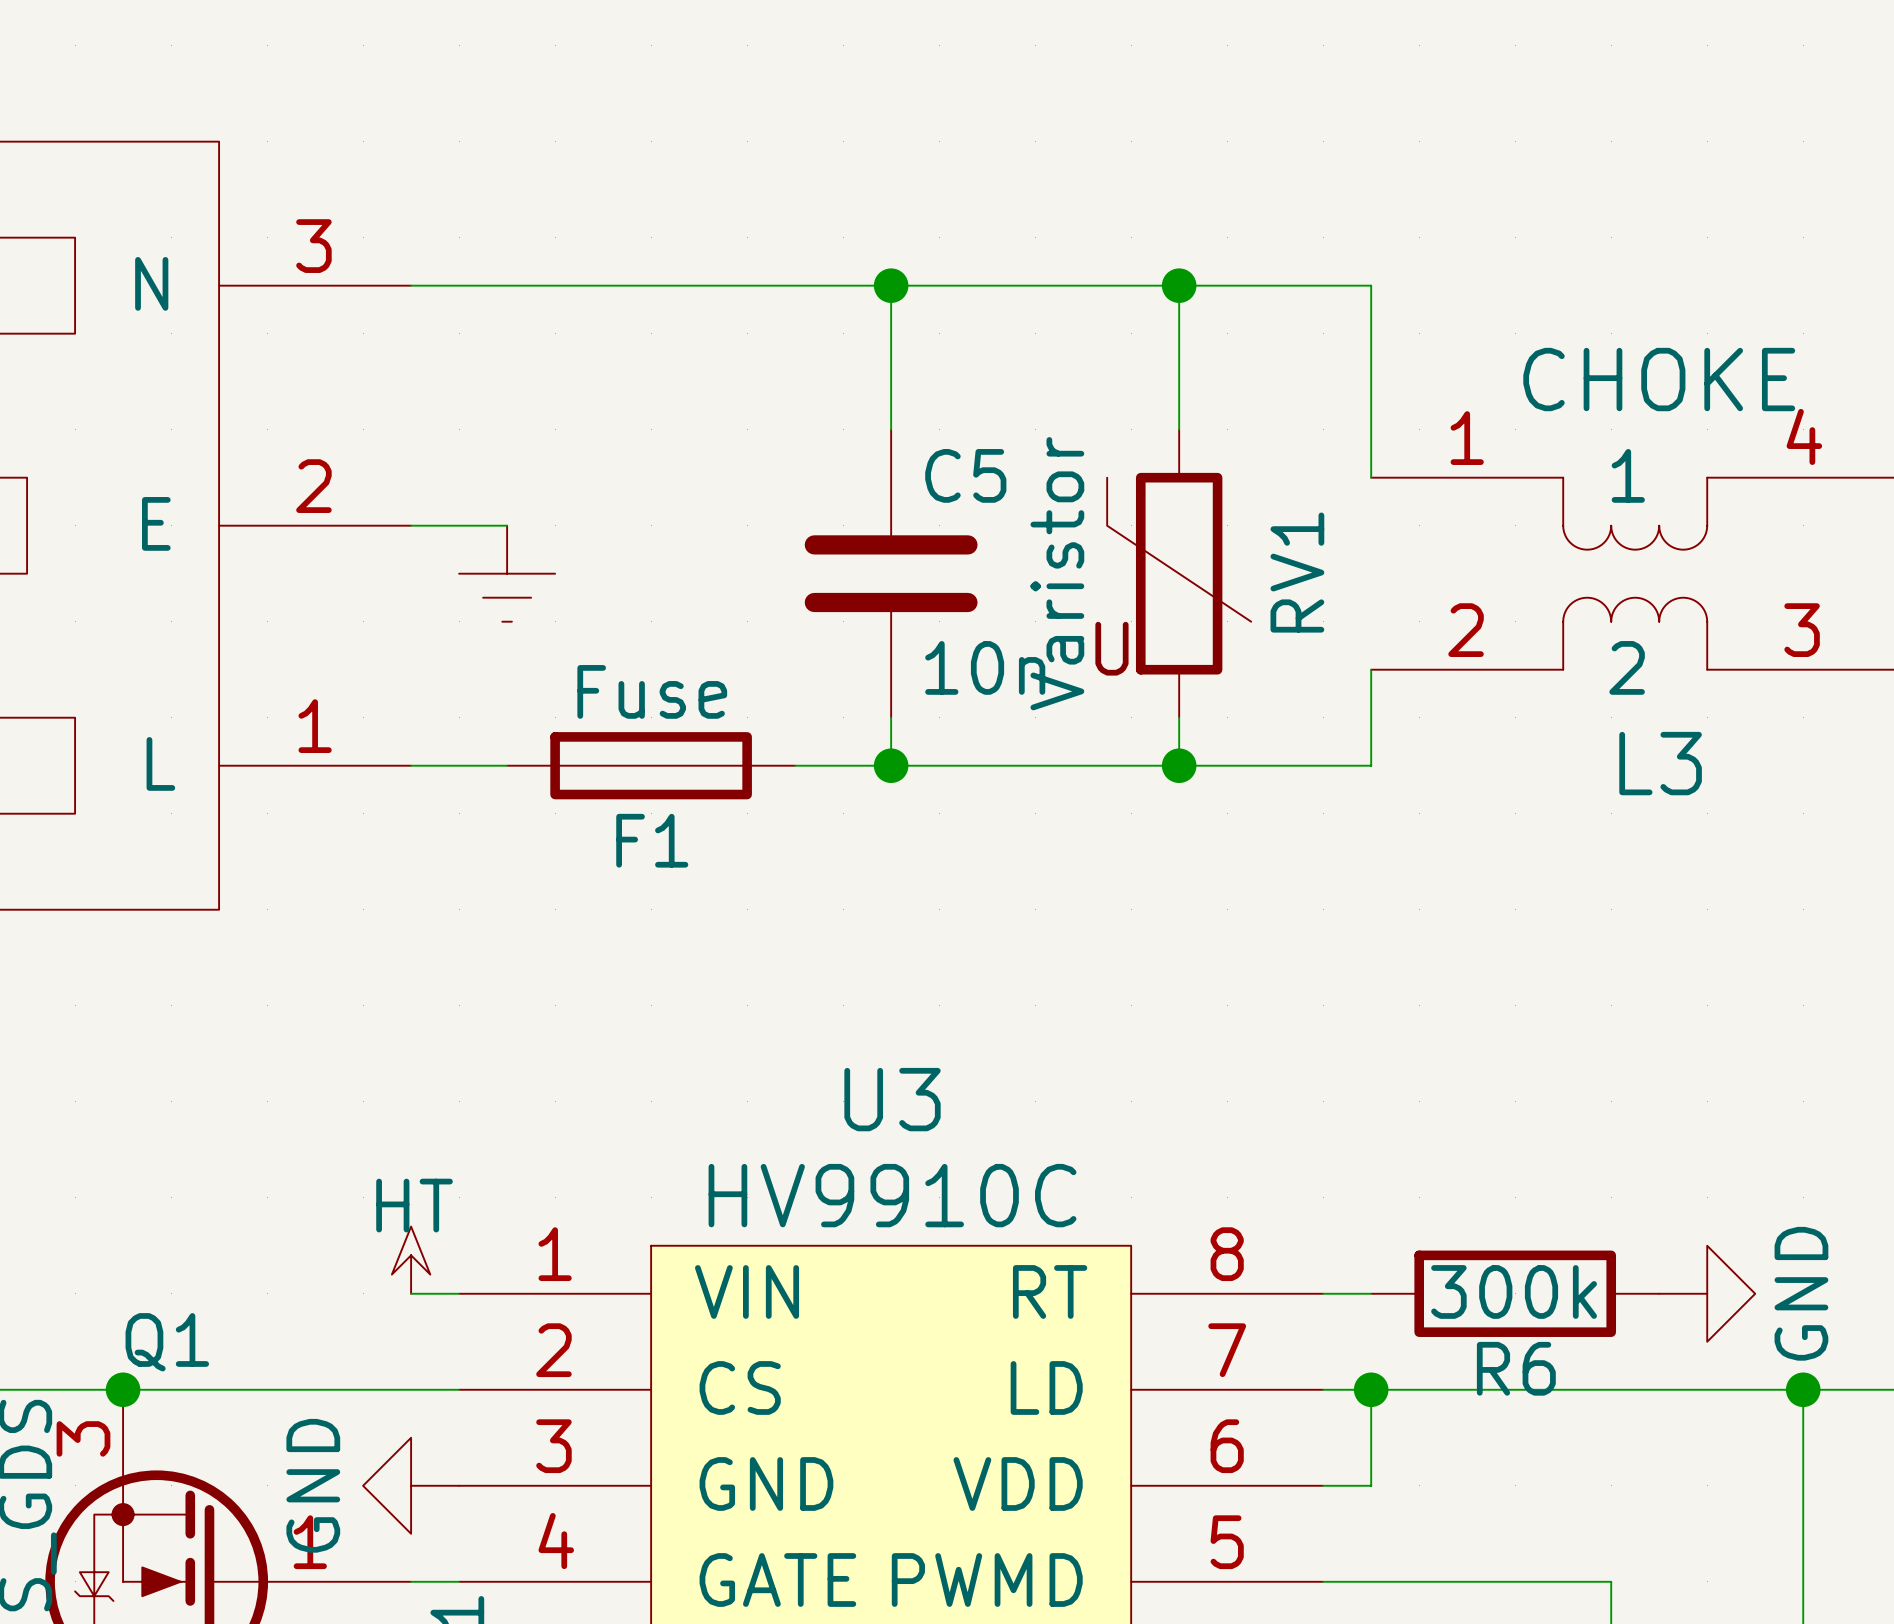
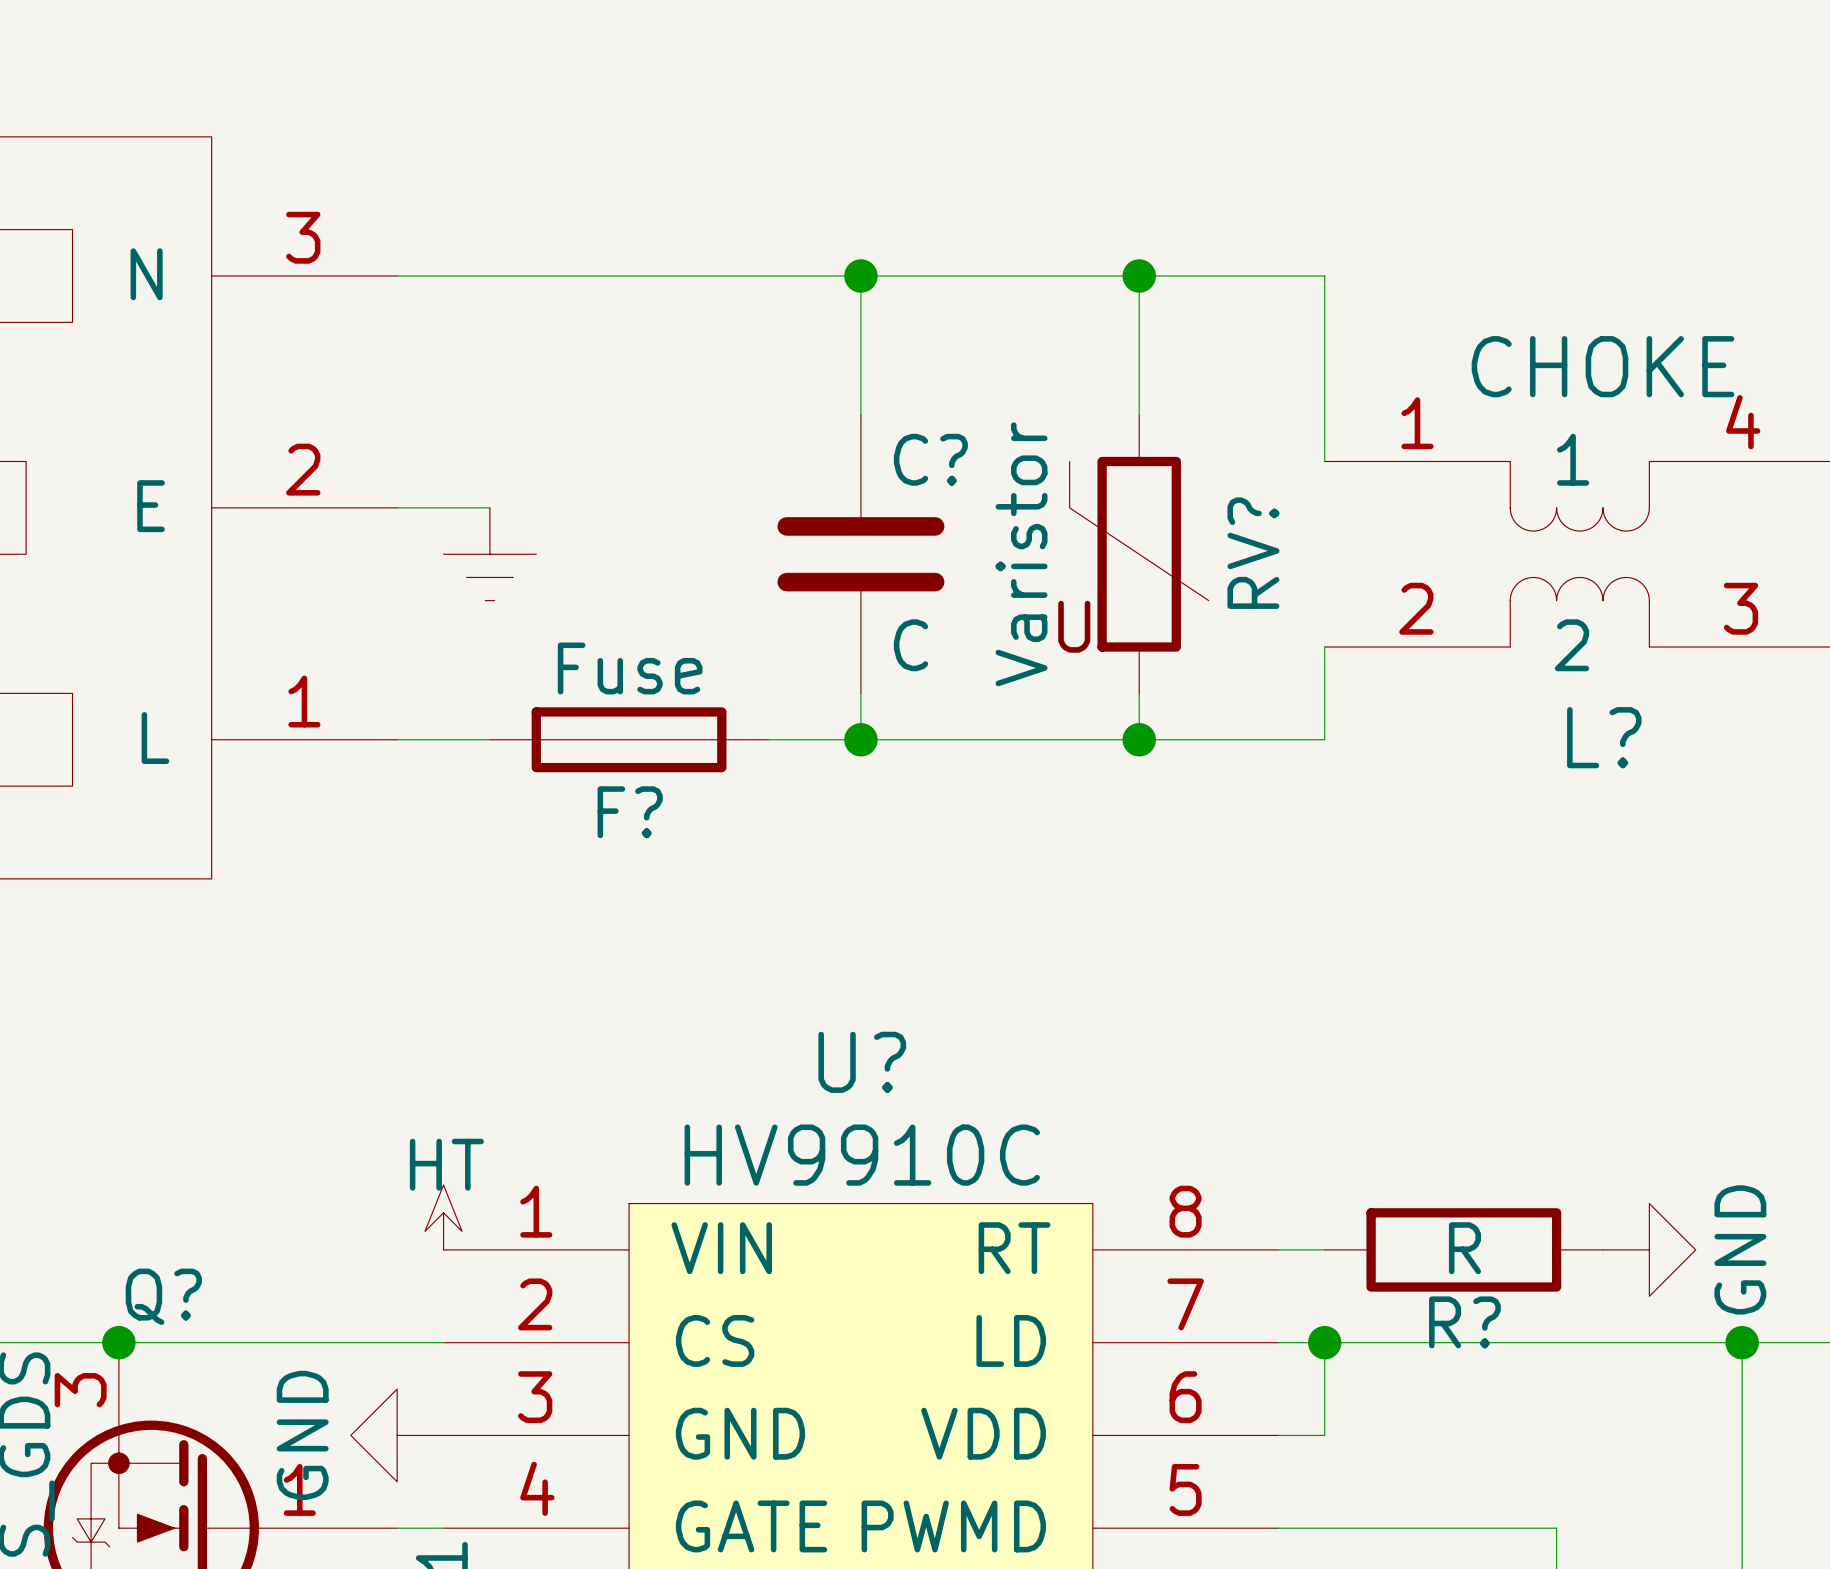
C5 name: C5 (965, 475) -> C? (930, 459)
RV1 name: RV1 (1297, 572) -> RV? (1253, 553)
C5 value: 10n (985, 667) -> C (910, 645)
L3 name: L3 (1660, 763) -> L? (1604, 737)
F1 name: F1 (652, 840) -> F? (630, 812)
U3 name: U3 (892, 1099) -> U? (862, 1062)
power symbol position: HT (411, 1260) -> HT (443, 1217)
R6 value: 300k (1514, 1291) -> R (1464, 1248)
wire: (411, 1293) (459, 1293) -> none
Q1 name: Q1 (167, 1342) -> Q? (163, 1296)
R6 name: R6 (1516, 1368) -> R? (1464, 1322)

